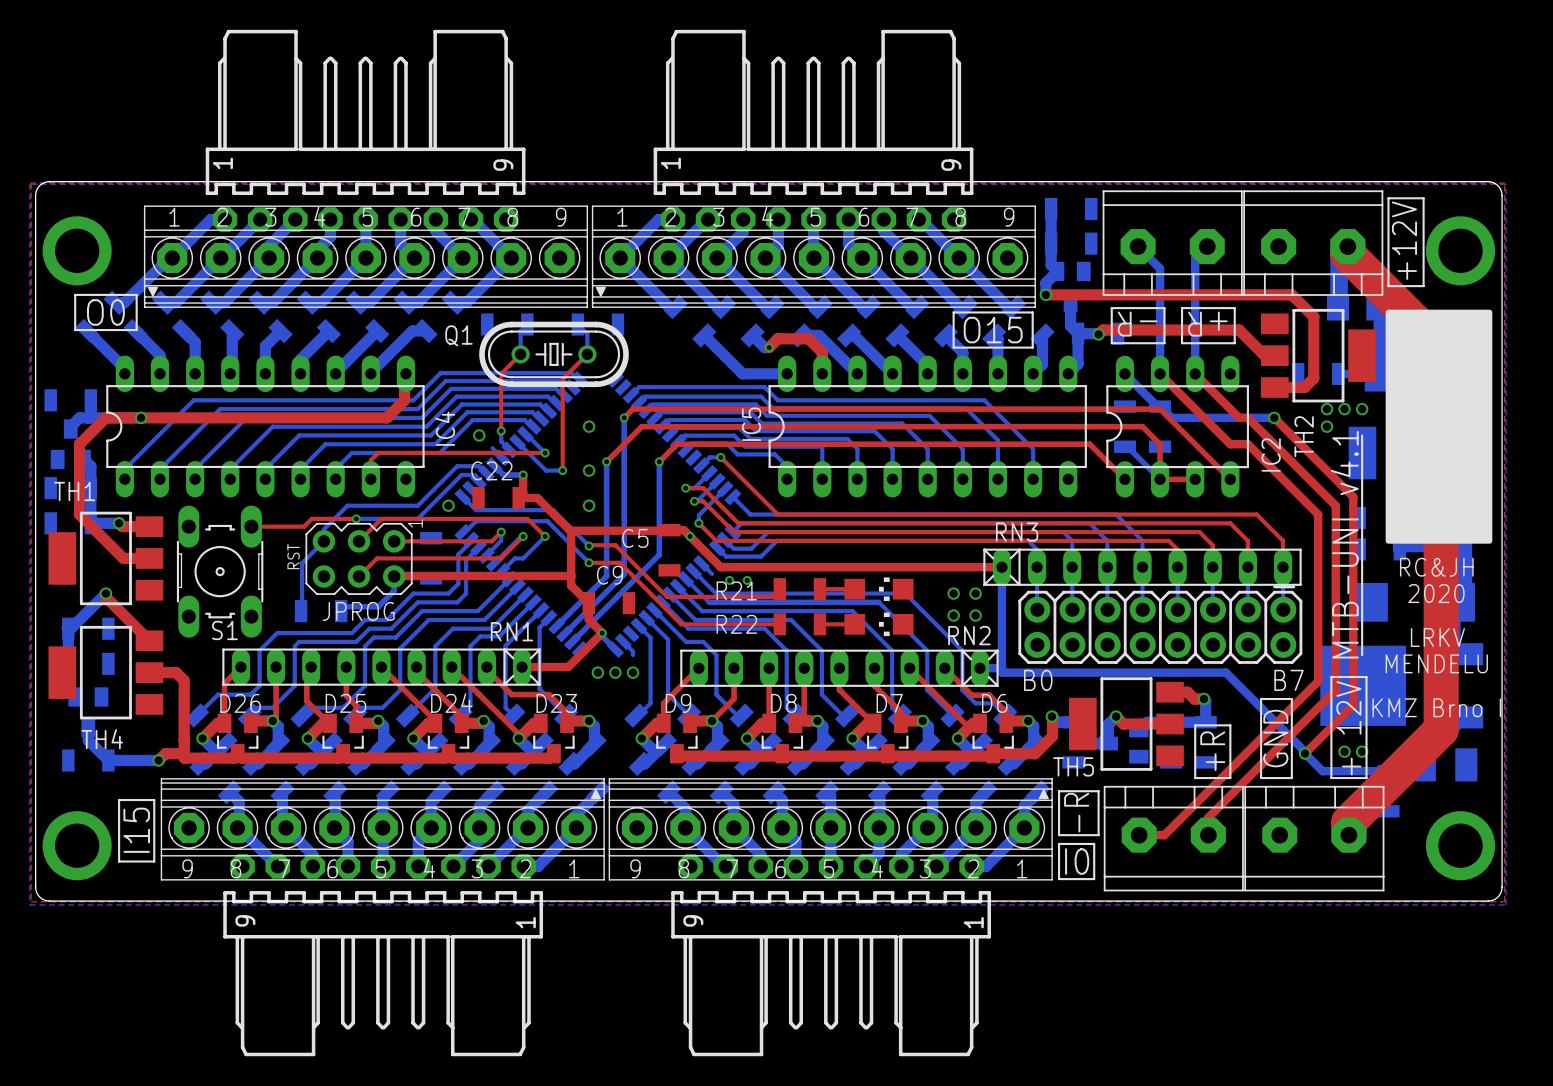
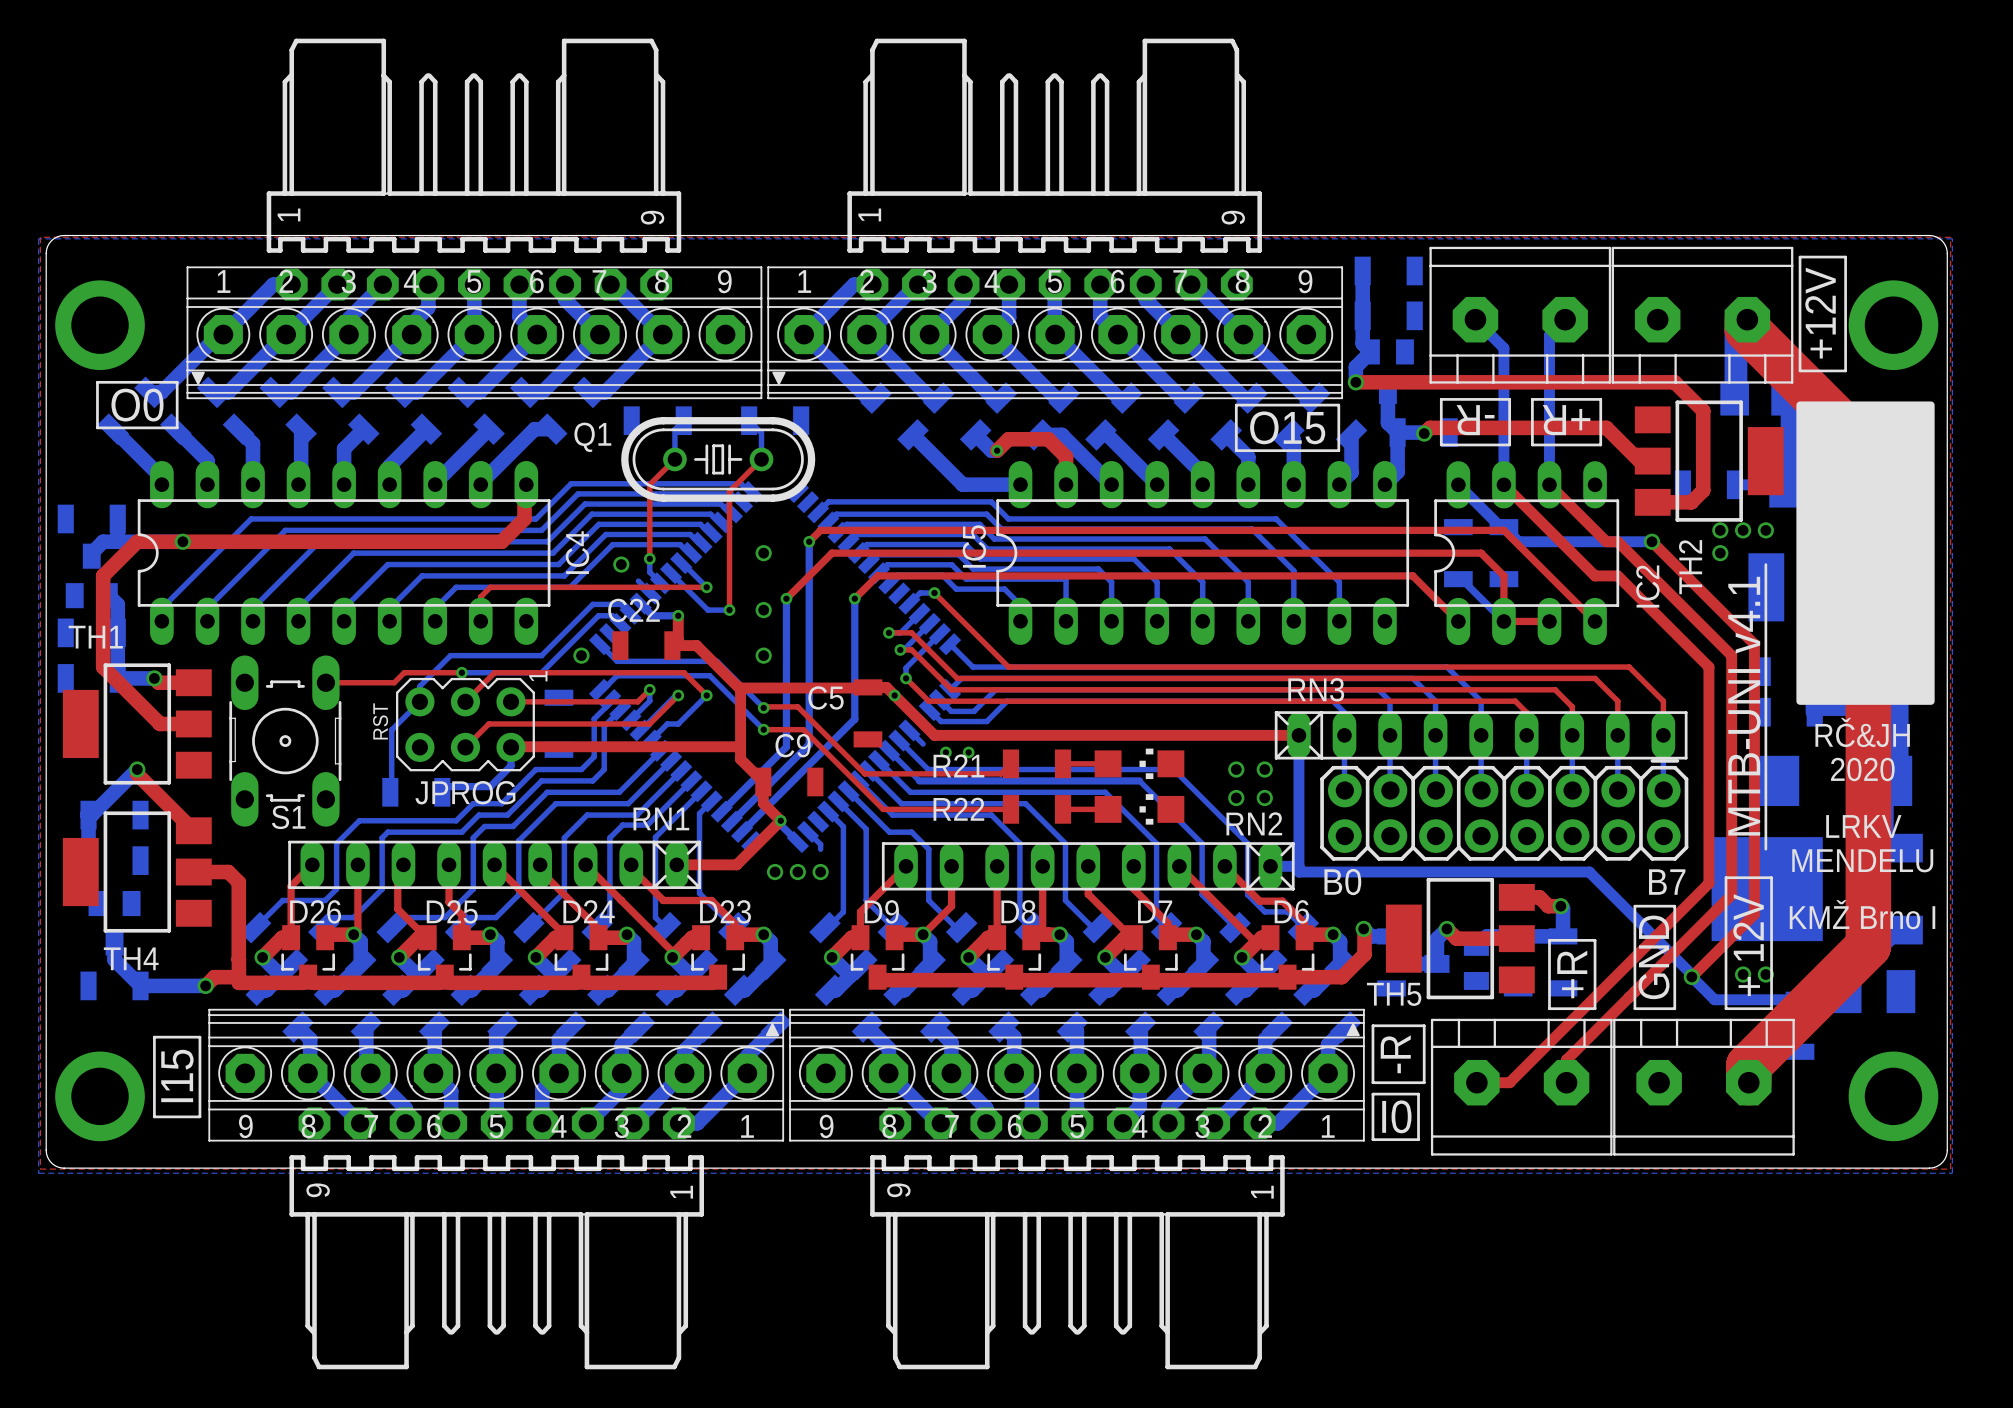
text: RC&JH (1436, 567) -> RČ&JH (1862, 732)
text: KMZ Brno I (1436, 707) -> KMŽ Brno I (1862, 914)

